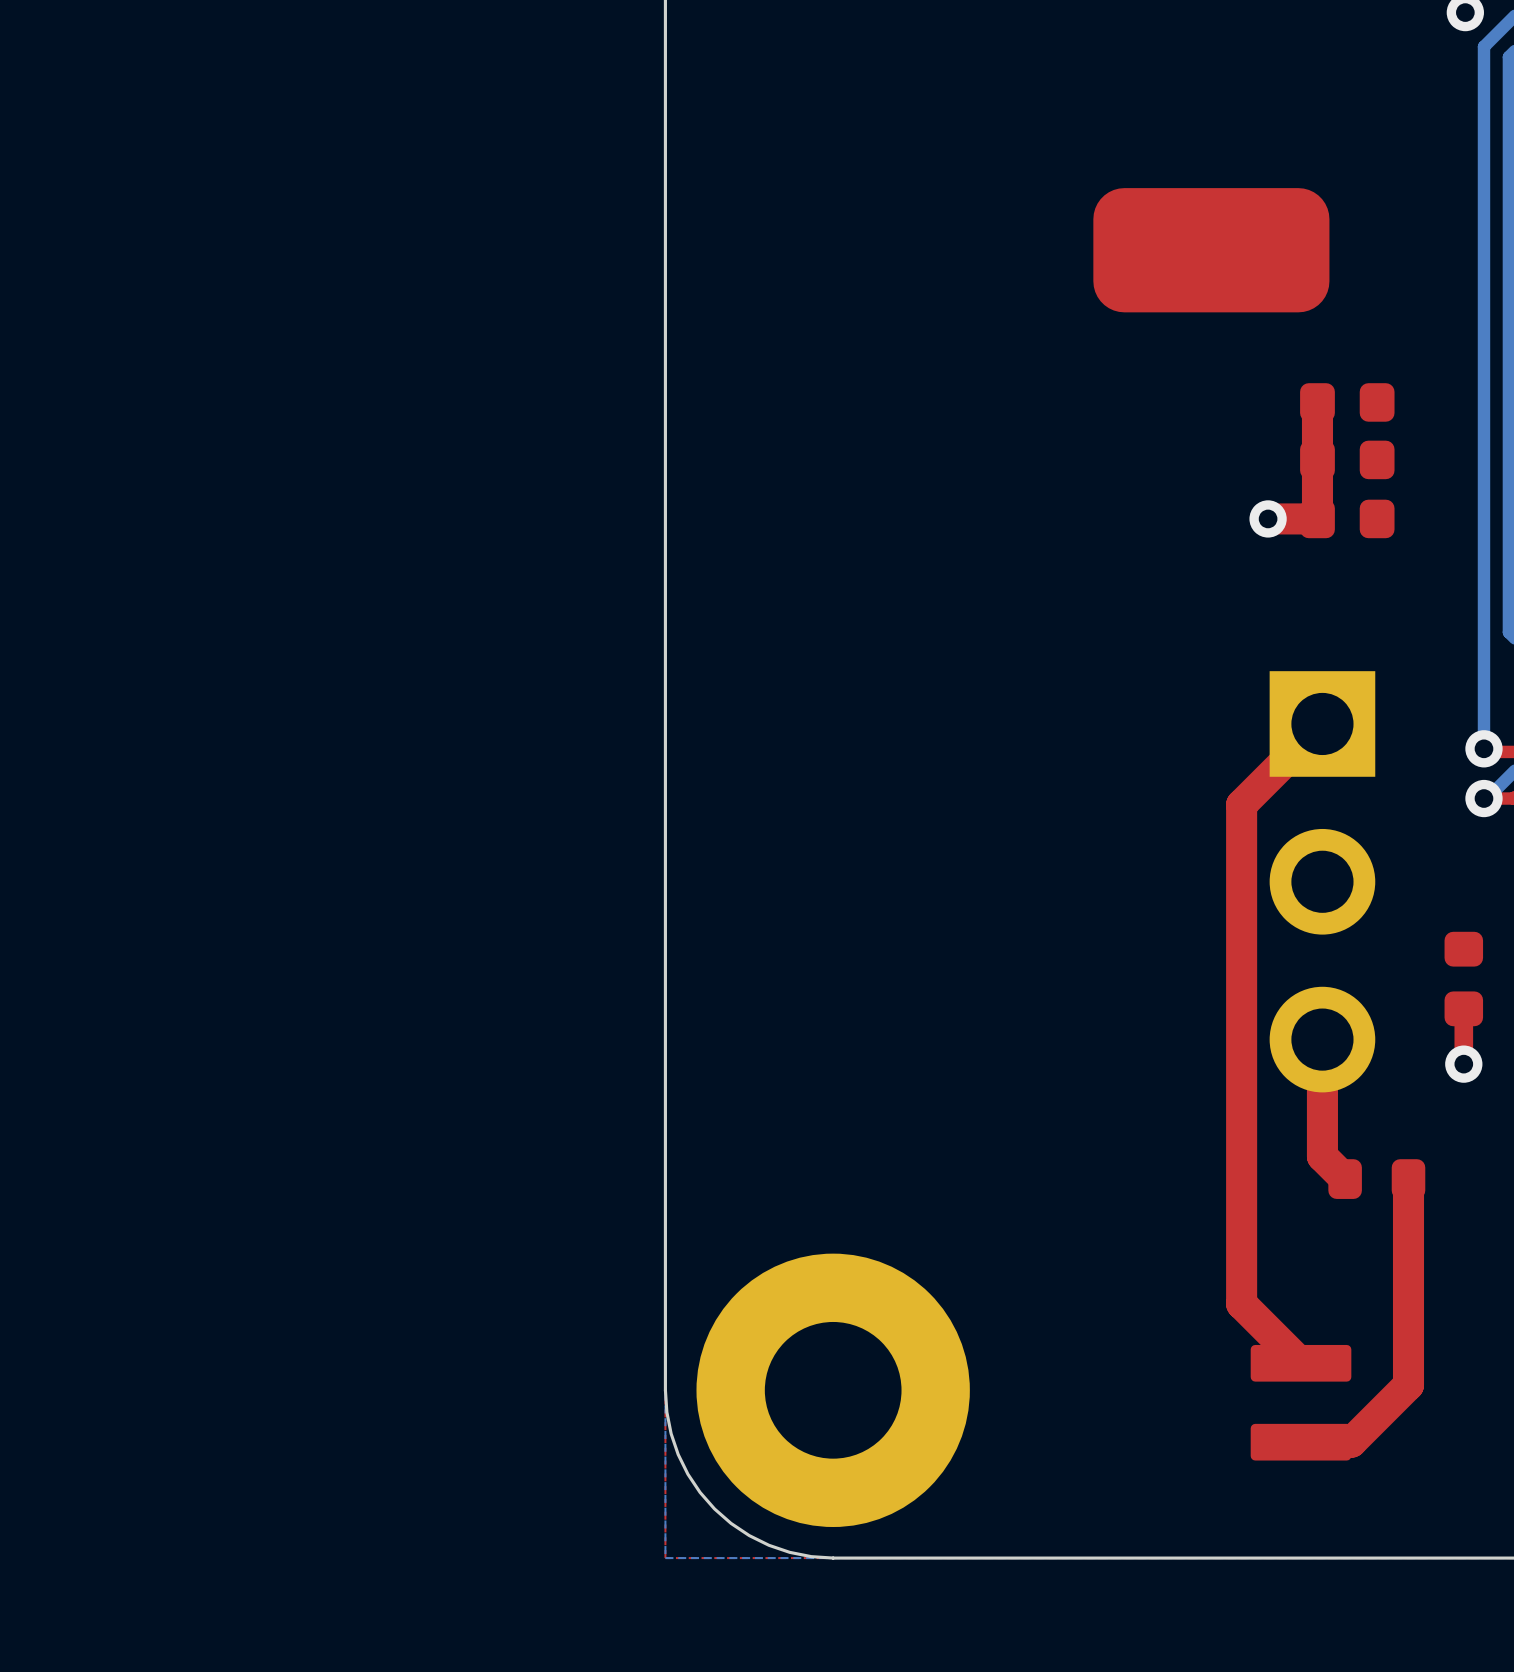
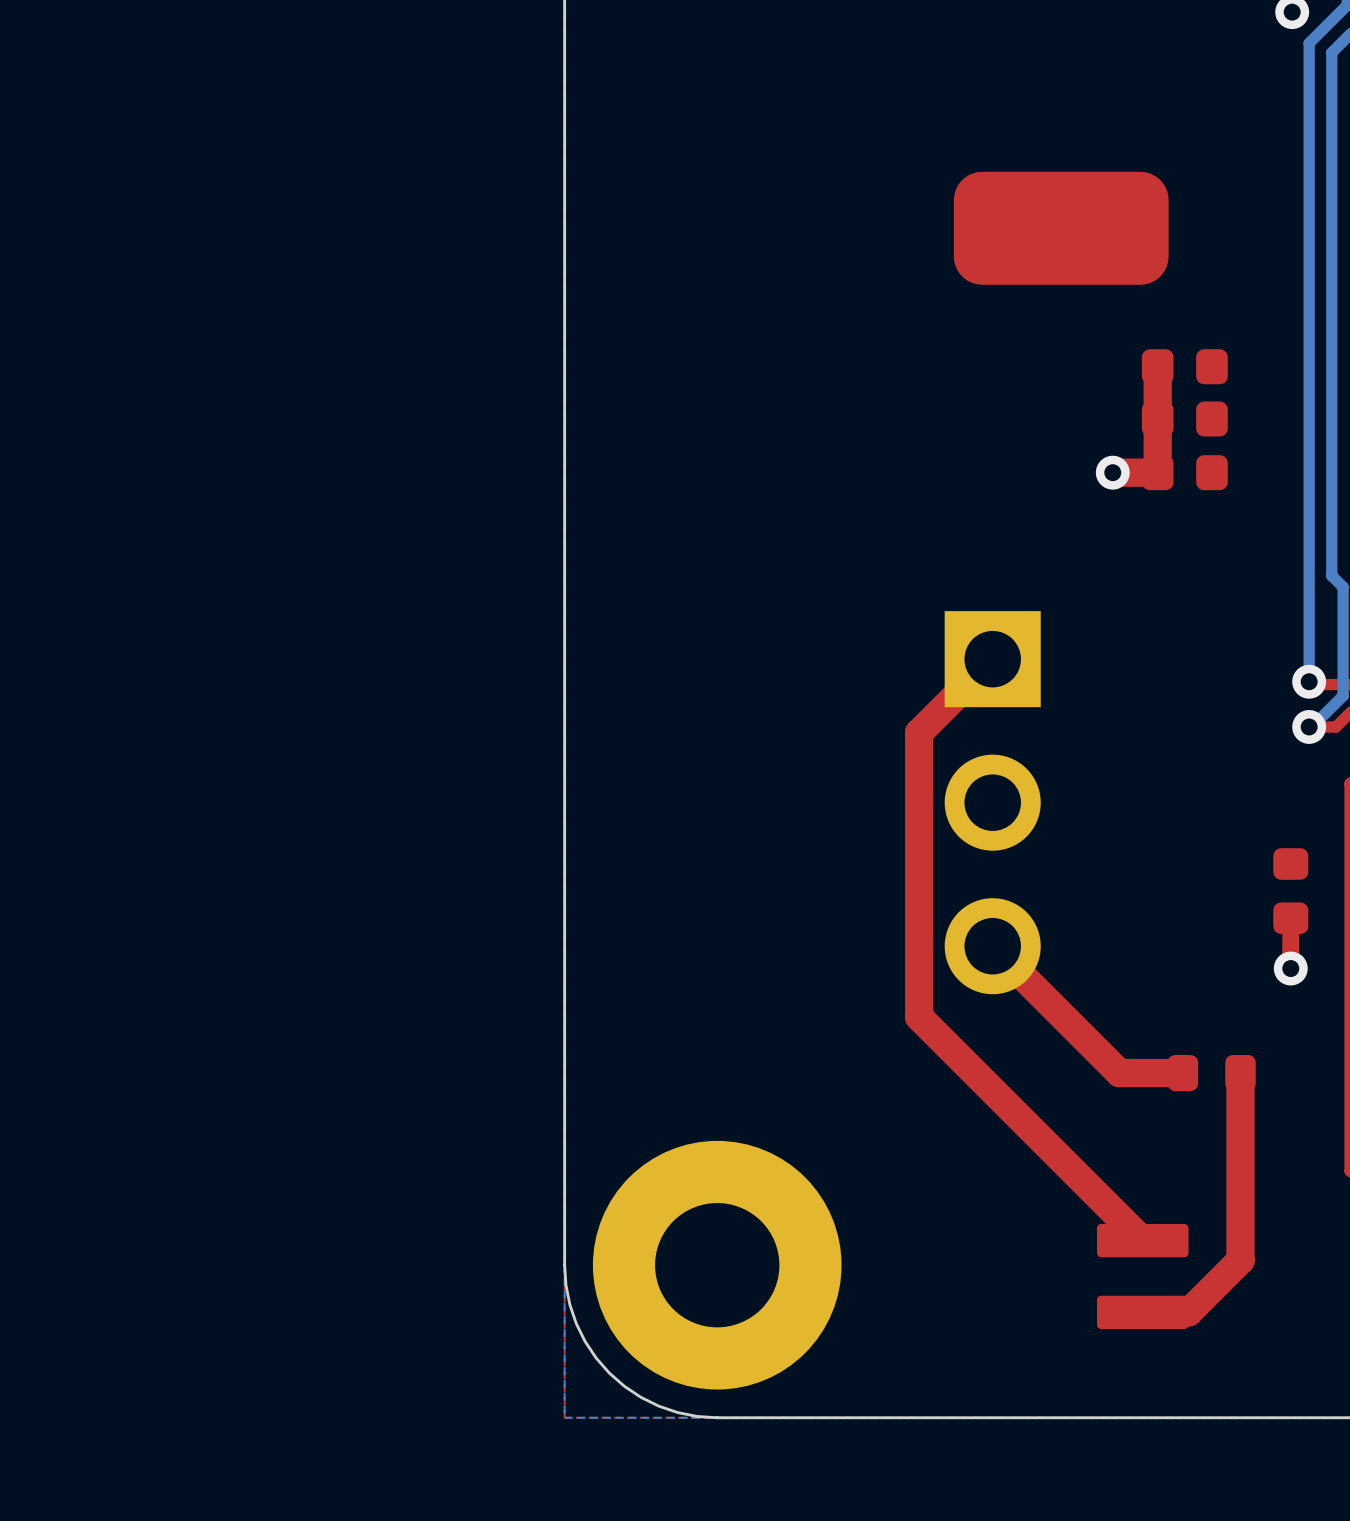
top track: (1322, 723) (1241, 804) (1241, 1303) -> (992, 659) (919, 732) (919, 1017) (1088, 1186)
part position: (1322, 881) -> (992, 802)
top track: (1322, 1039) (1322, 1156) (1345, 1179) -> (992, 946) (1119, 1073) (1182, 1073)

